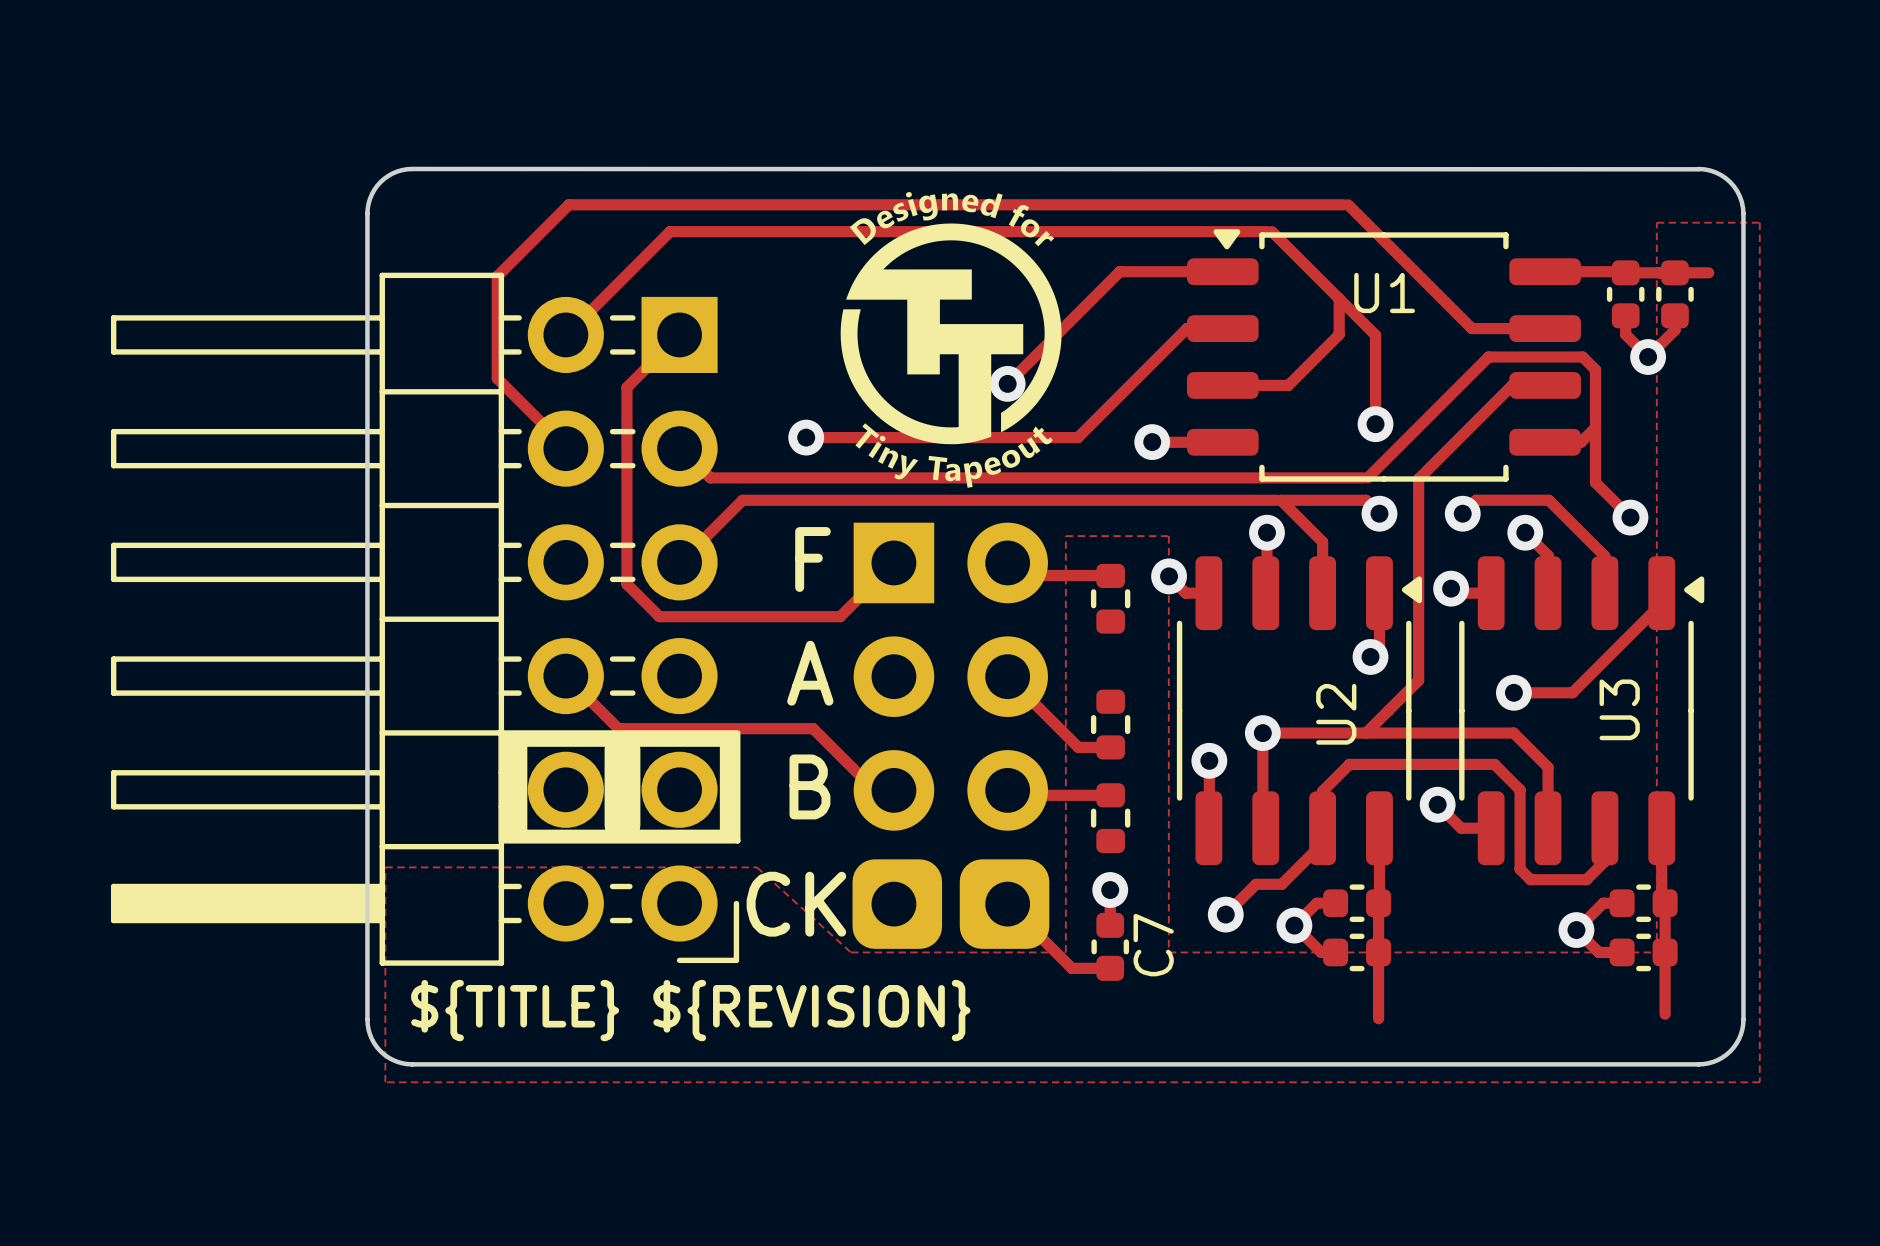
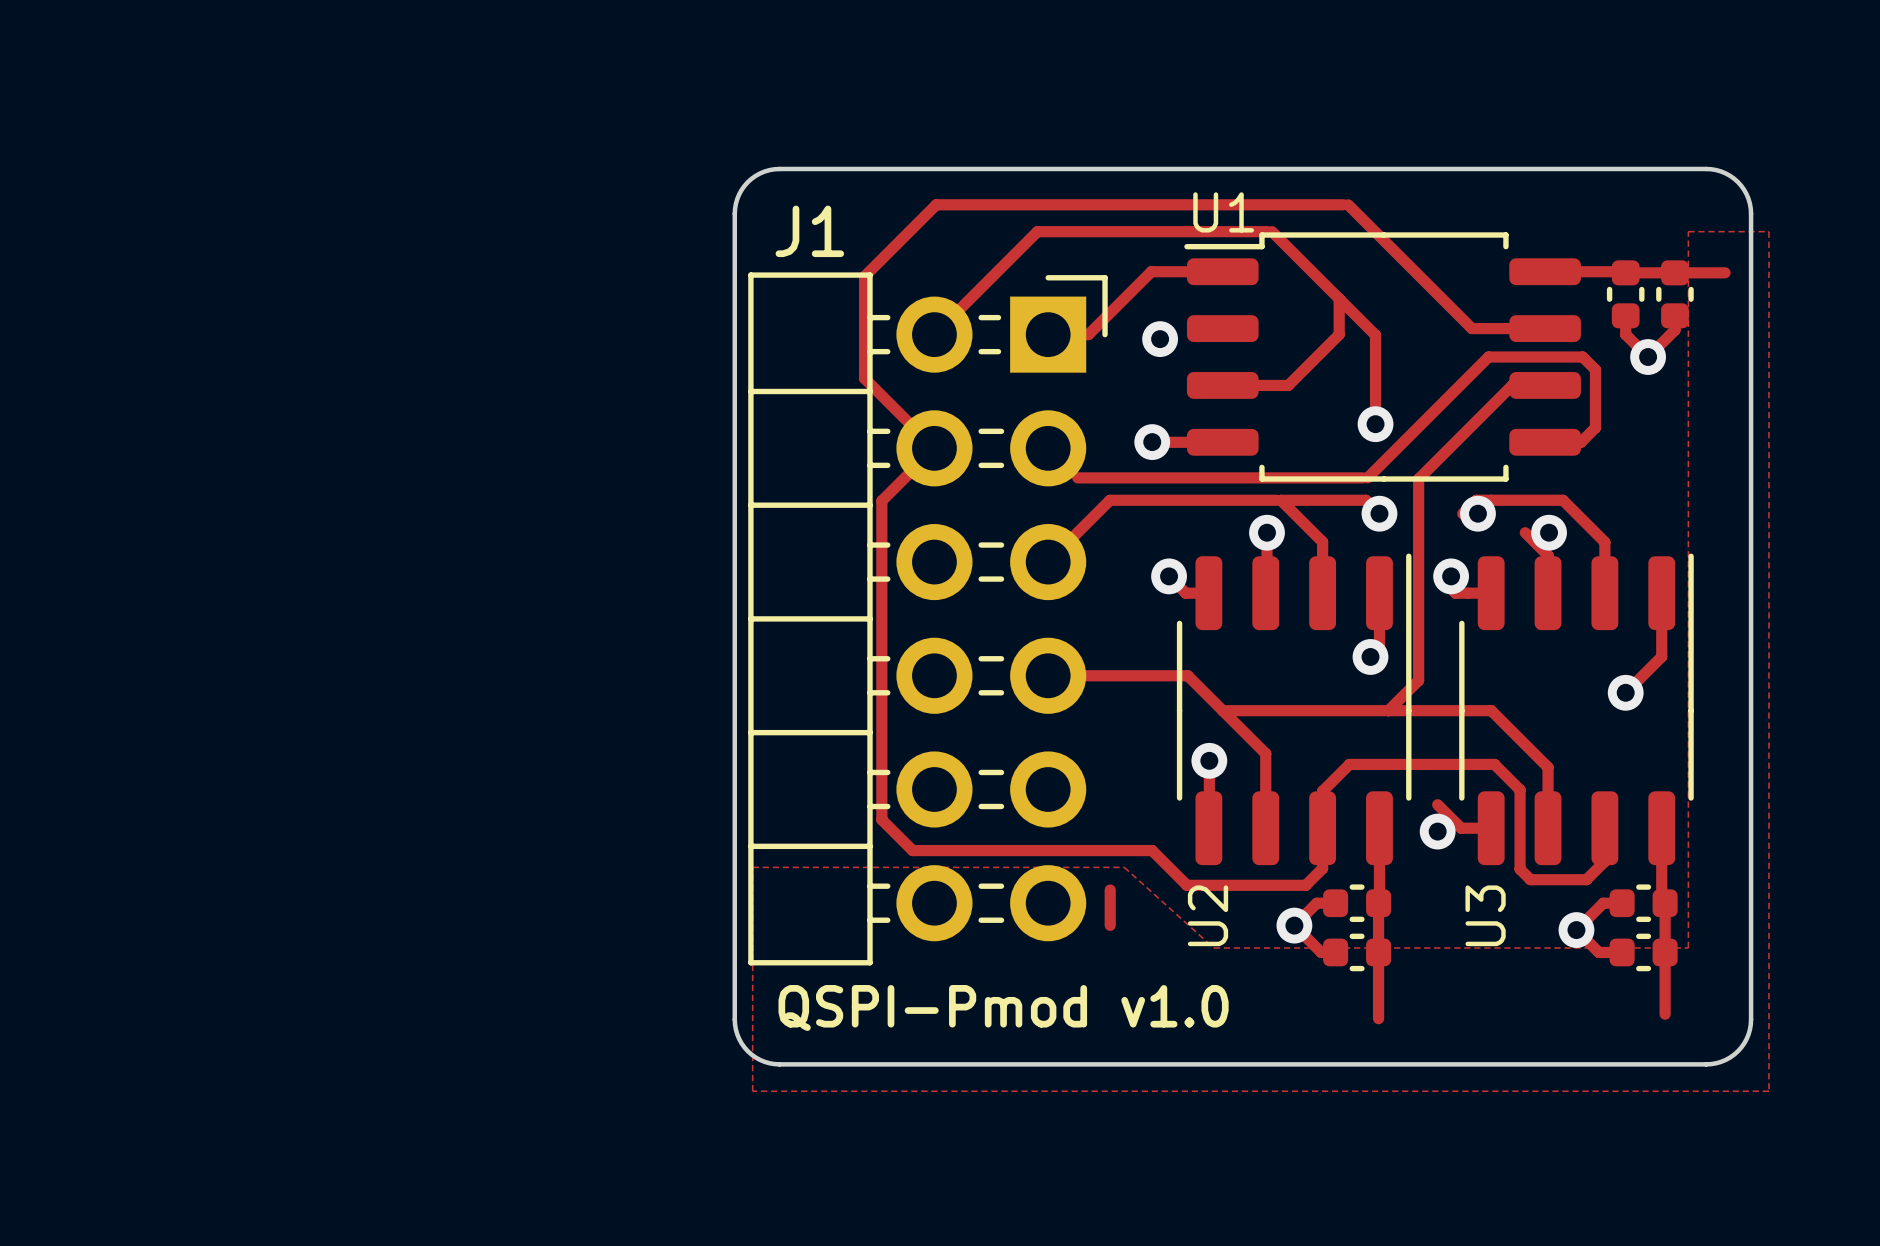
board edge: (1698, 168) (1715, 172) (1730, 182) (1739, 196) (1743, 213) (1743, 1019) (1739, 1039) (1730, 1051) (1718, 1059) (1698, 1064) -> none
board edge: (1698, 169) (412, 168) (392, 173) (380, 182) (371, 194) (367, 213) (367, 1019) (371, 1039) (384, 1054) (392, 1059) (407, 1064) (779, 1064) -> (1698, 1064) (1716, 1063) (1734, 1054) (1746, 1039) (1751, 1019) (1751, 213) (1746, 194) (1737, 182) (1721, 171) (1706, 168) (779, 168) (760, 173) (747, 182) (739, 194) (734, 213) (734, 1019) (739, 1039) (747, 1051) (764, 1061) (779, 1064)
drawing: [840, 192, 1062, 488] -> none
track: (936, 204) (568, 204) (497, 276) (497, 378) (567, 448) -> none
U1 footprint: [1186, 229, 1581, 482] -> [1184, 232, 1581, 482]
track: (1037, 231) (670, 231) (567, 334) -> (1037, 231) (934, 334)
track: (1151, 271) (1119, 271) (1007, 383) -> (1151, 271) (1088, 334) (1048, 334)
track: none -> (1708, 272) (1725, 272)
U1 name position: U1 (1384, 293) -> U1 (1223, 212)
track: (1222, 328) (1186, 328) (1077, 437) (806, 437) -> none
track: (679, 334) (626, 387) (626, 584) (659, 616) (840, 616) (880, 576) -> none
via position: (1007, 383) -> (1160, 339)
track: (1595, 427) (1595, 482) (1630, 517) -> none
via: (806, 437) -> none
track: (680, 448) (710, 477) (1077, 477) -> none
track: (1109, 500) (742, 500) (680, 562) -> (1109, 500) (1048, 562)
track: (1548, 500) (1604, 556) (1604, 593) -> (1548, 500) (1563, 500) (1604, 542) (1604, 556)
via position: (1462, 513) -> (1477, 513)
via: (1630, 517) -> none
via position: (1525, 532) -> (1549, 532)
U2 footprint: [1176, 556, 1423, 866] -> [1176, 553, 1412, 866]
U3 footprint: [1459, 556, 1705, 866] -> [1459, 553, 1694, 866]
text: F (812, 559) -> none
track: (1026, 574) (1110, 575) -> none
via position: (1451, 588) -> (1451, 576)
part: (1110, 598) -> none
track: (1661, 603) (1572, 692) (1513, 692) -> (1661, 603) (1661, 656) (1625, 692)
J1: none -> (927, 618)
part: (425, 619) -> none
text: A (810, 673) -> none
track: none -> (1048, 675) (1187, 675) (1265, 753) (1265, 828)
track: (565, 676) (618, 728) (813, 728) (874, 790) -> none
track: (1007, 676) (1078, 747) (1110, 747) -> none
via: (1513, 692) -> none
via: none -> (1625, 692)
U3 name position: U3 (1619, 709) -> U3 (1485, 915)
track: (1388, 710) (1366, 733) -> none
U2 name position: U2 (1336, 714) -> U2 (1208, 915)
part: (1110, 724) -> none
via: (1262, 733) -> none
track: (1513, 733) (1262, 733) (1262, 825) (1265, 828) -> (1513, 733) (1491, 710) (1222, 710)
part: (950, 735) -> none
text: B (809, 786) -> none
track: (1026, 790) (1031, 795) (1110, 795) -> none
via position: (1437, 804) -> (1437, 831)
part: (1110, 818) -> none
track: (1322, 843) (1281, 884) (1256, 884) (1225, 914) -> (1322, 843) (1322, 868) (1305, 885) (1186, 885) (1152, 850) (912, 850) (881, 819) (881, 500) (934, 448) (864, 378) (864, 276) (936, 204)
zone outline: (752, 867) (385, 867) (385, 1082) (1759, 1082) (1759, 222) (1656, 222) (1656, 952) (1168, 952) (1168, 536) (1065, 536) (1065, 952) (850, 952) (756, 867) -> (752, 867) (752, 1091) (1768, 1091) (1768, 231) (1688, 231) (1688, 947) (1213, 947) (1124, 867) (756, 867)
via: (1110, 890) -> none
text: CK (796, 904) -> none
track: (1007, 904) (1071, 968) (1110, 968) -> none
via: (1225, 914) -> none
C7: (1110, 946) -> none
text: none -> QSPI-Pmod v1.0 (1003, 1007)
text: ${TITLE} ${REVISION} (690, 1010) -> none

